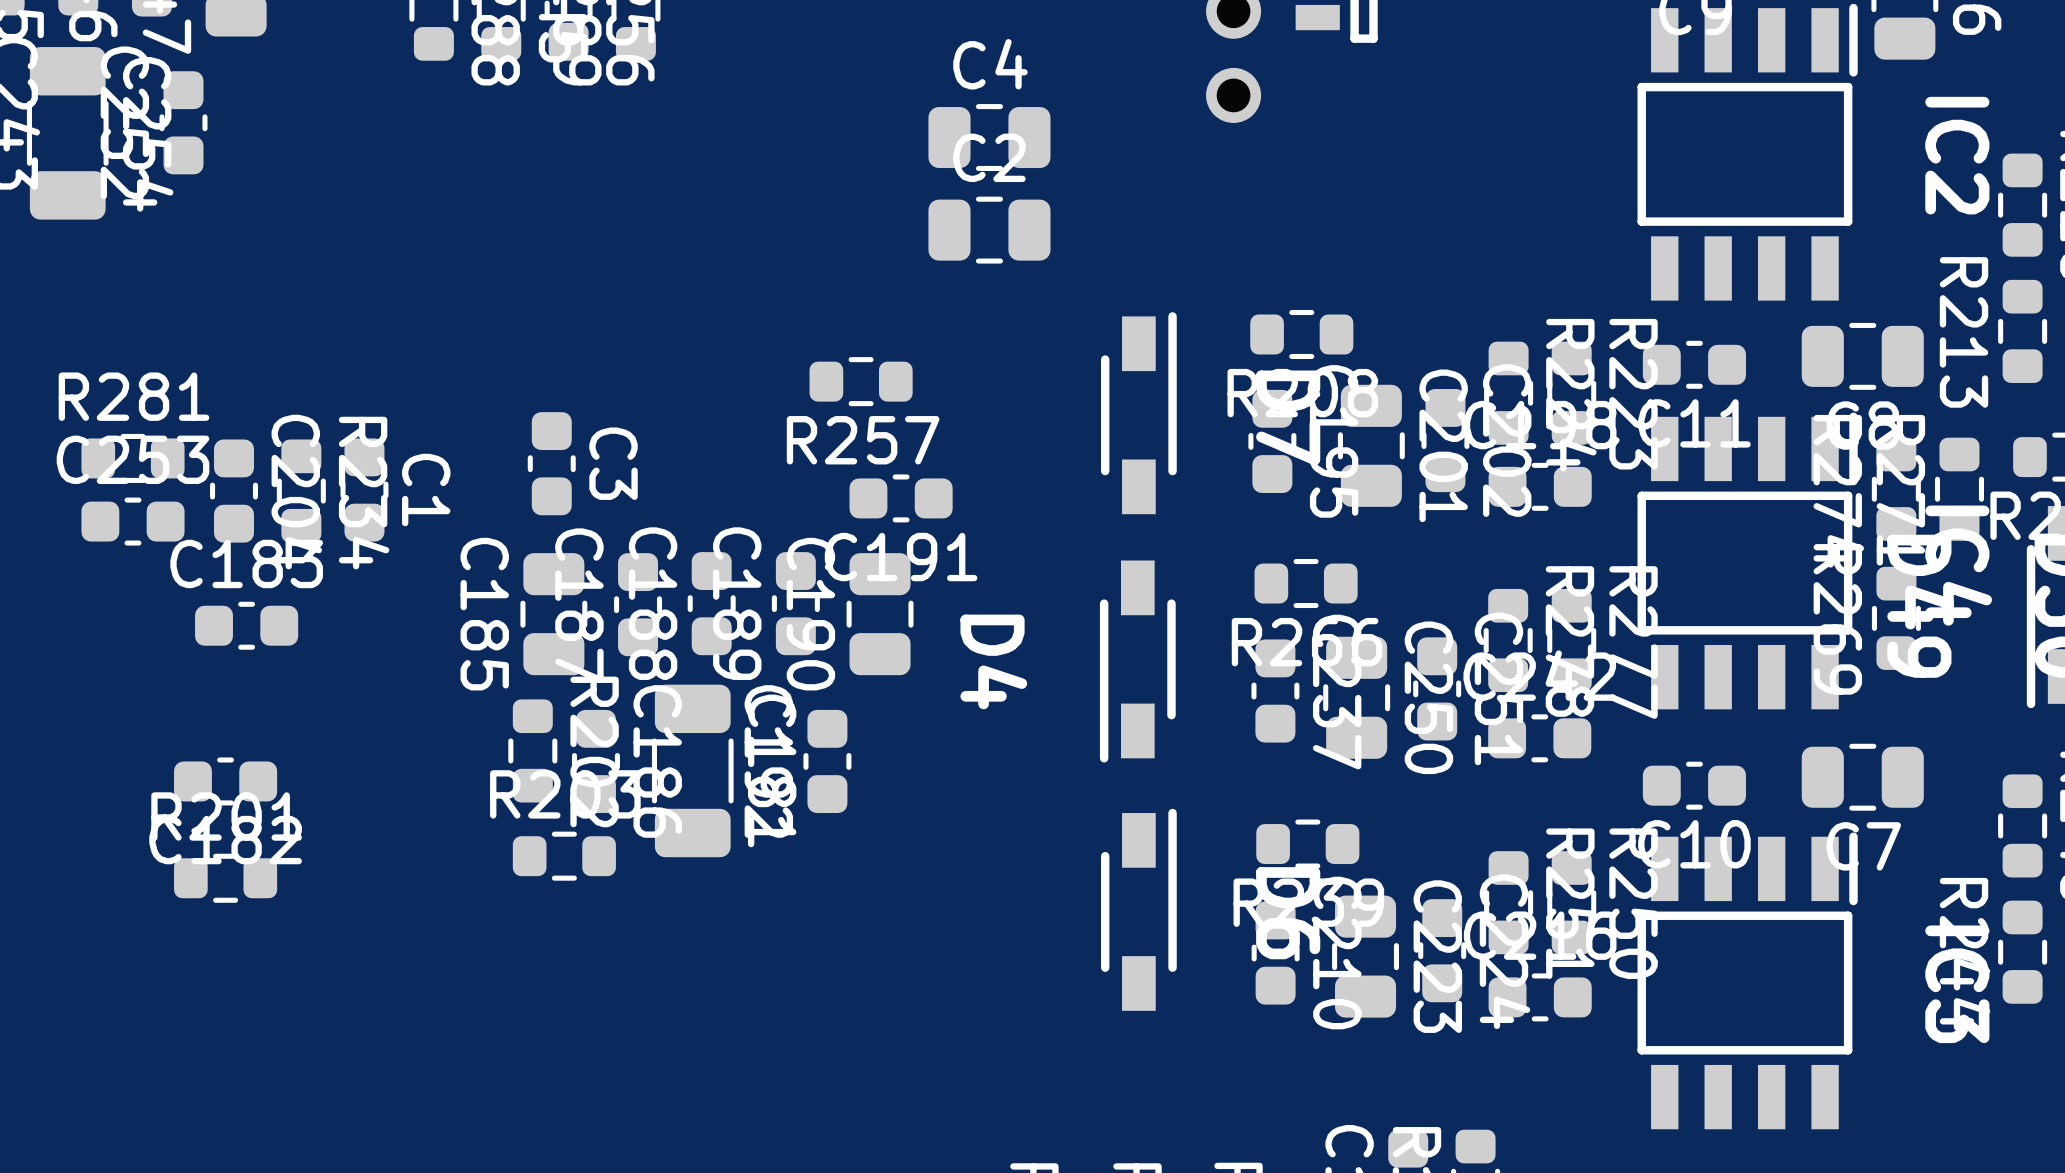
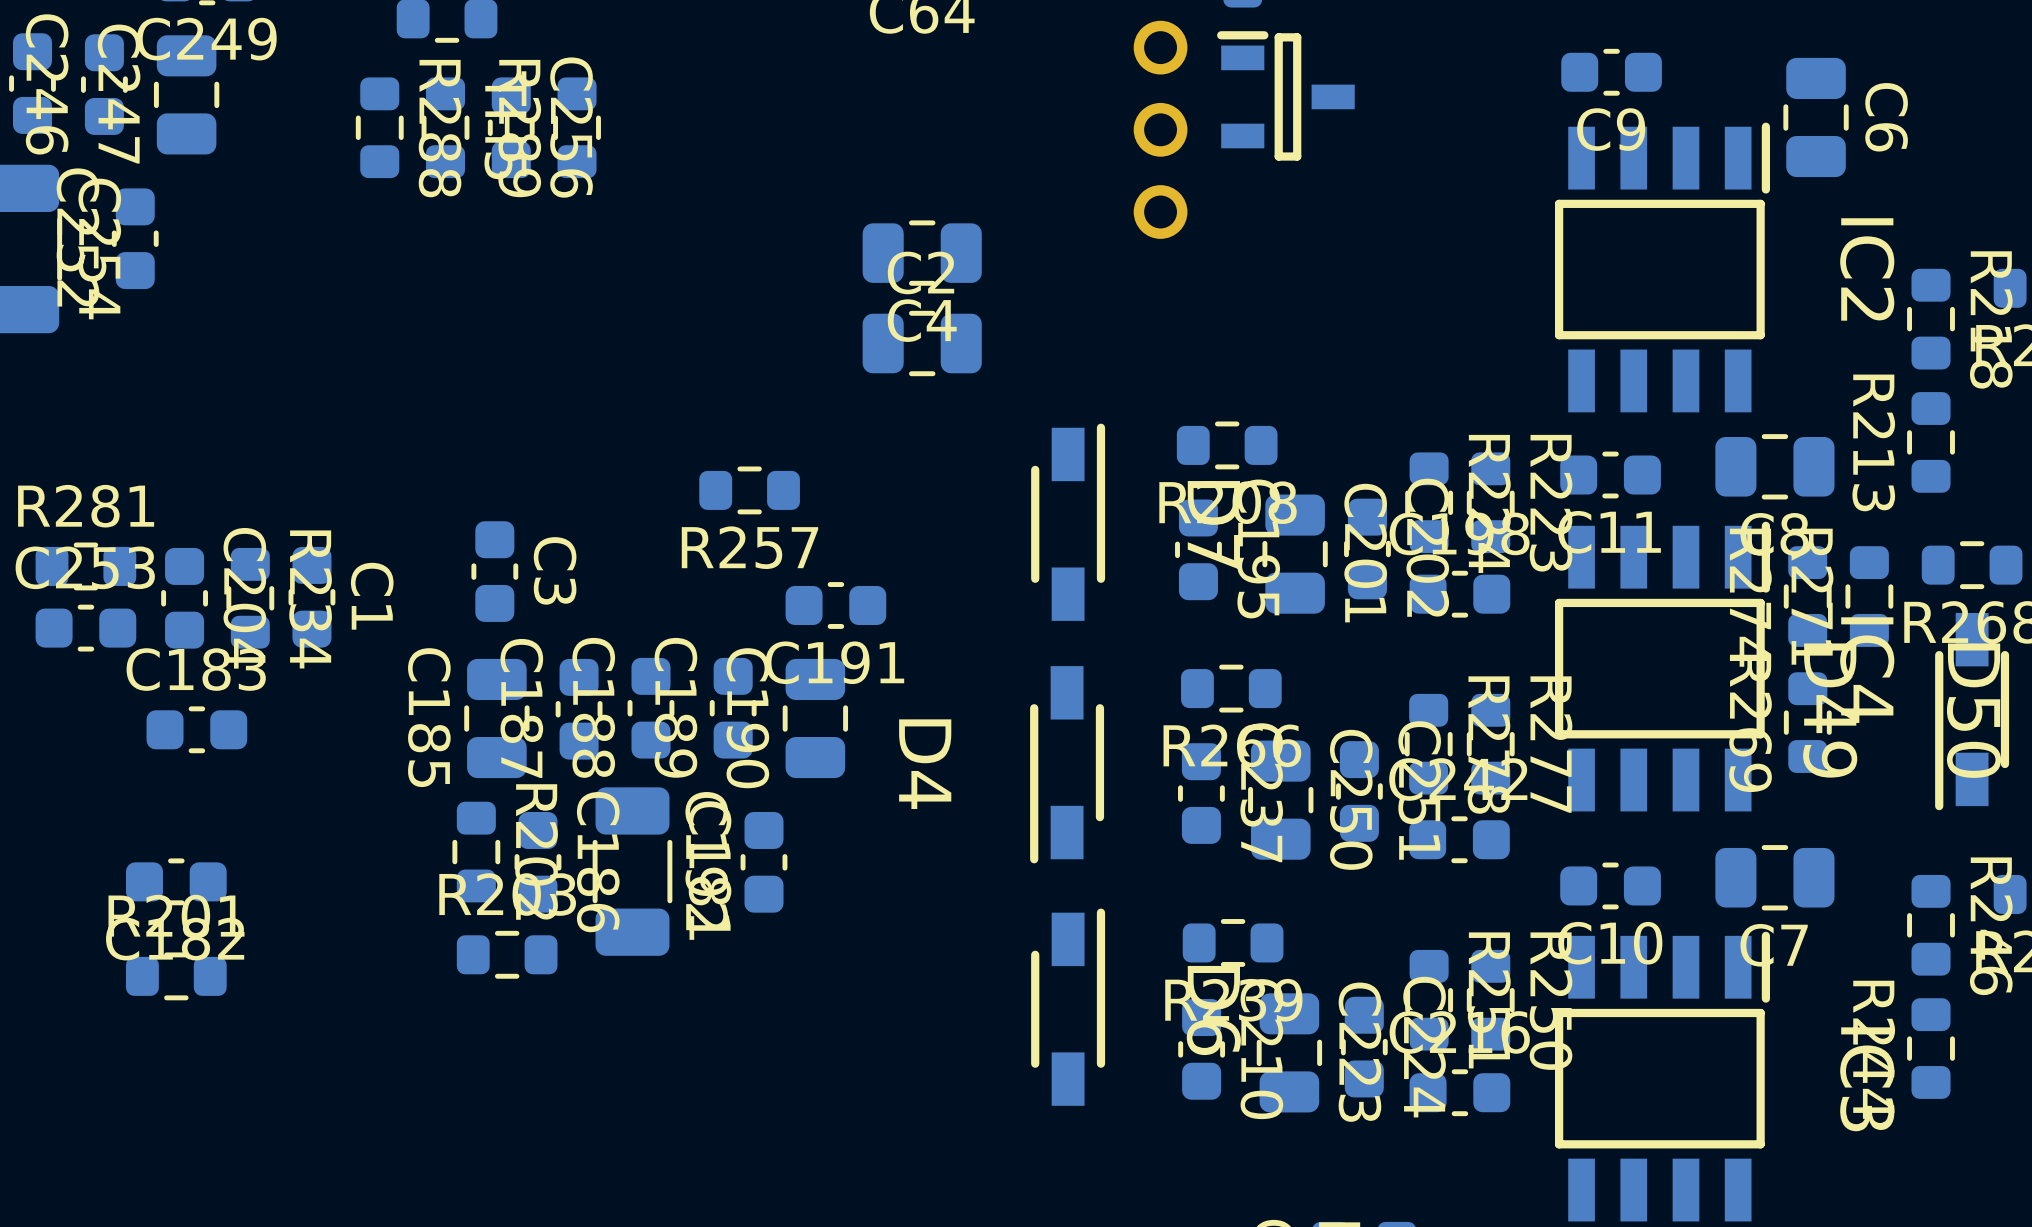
C4 name position: C4 (990, 64) -> C4 (922, 320)
R257 position: (861, 381) -> (749, 490)

